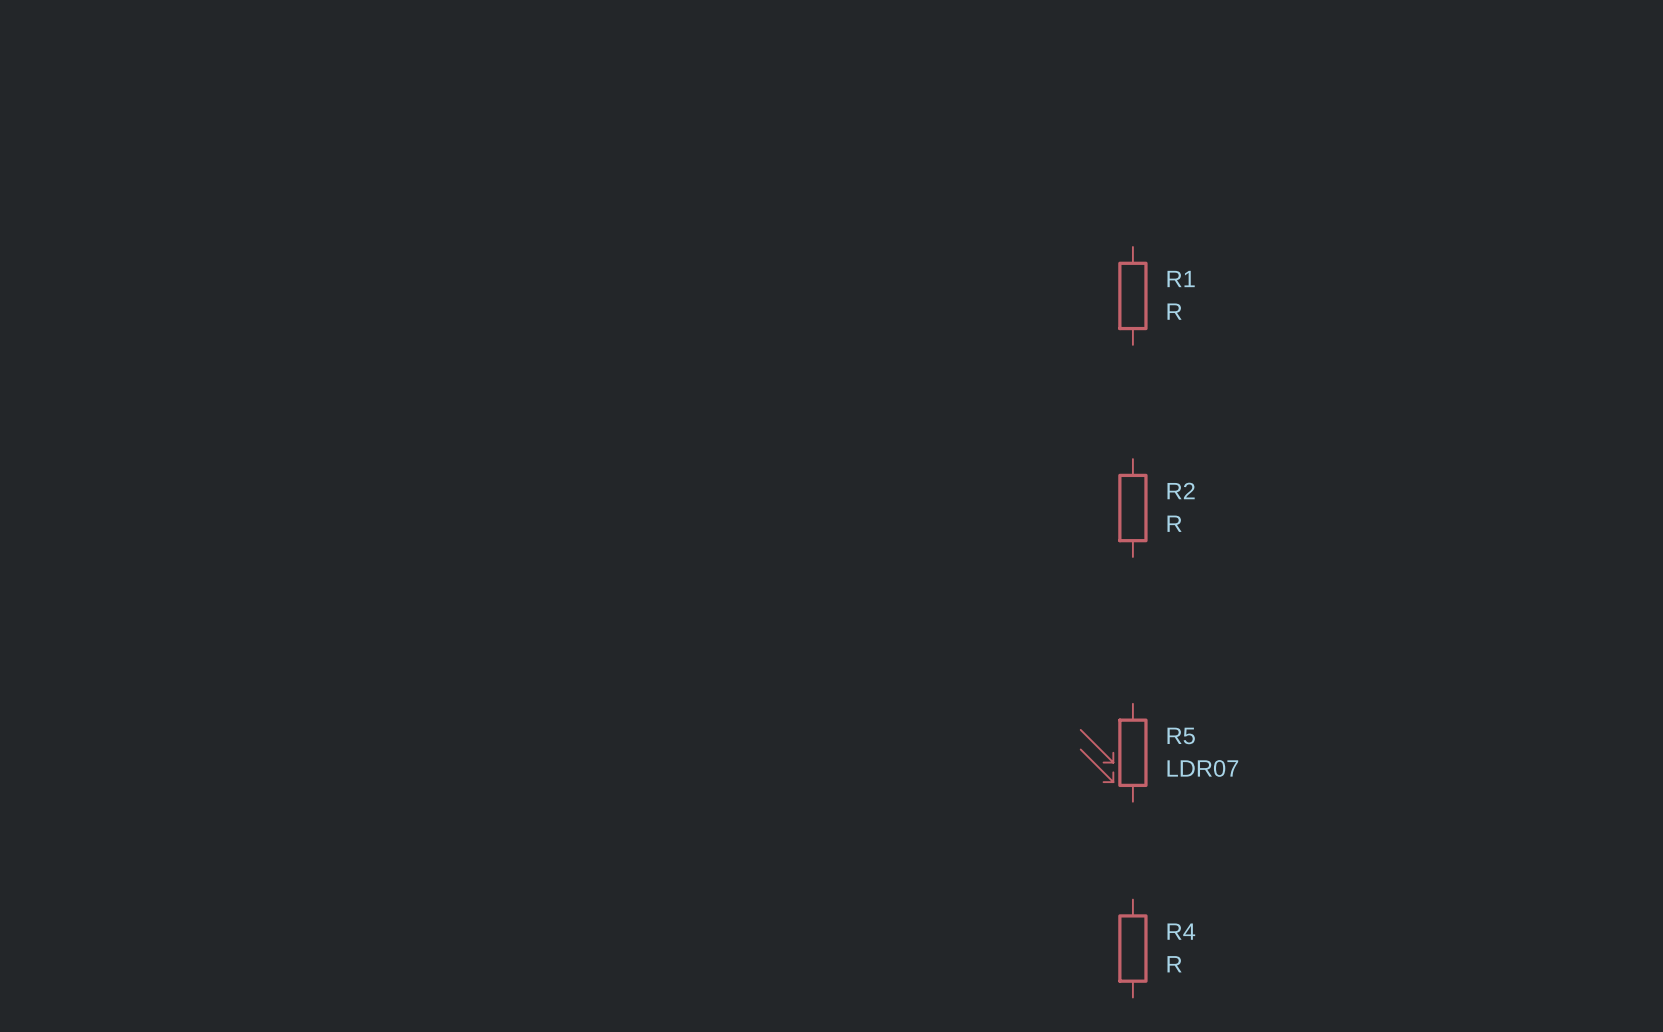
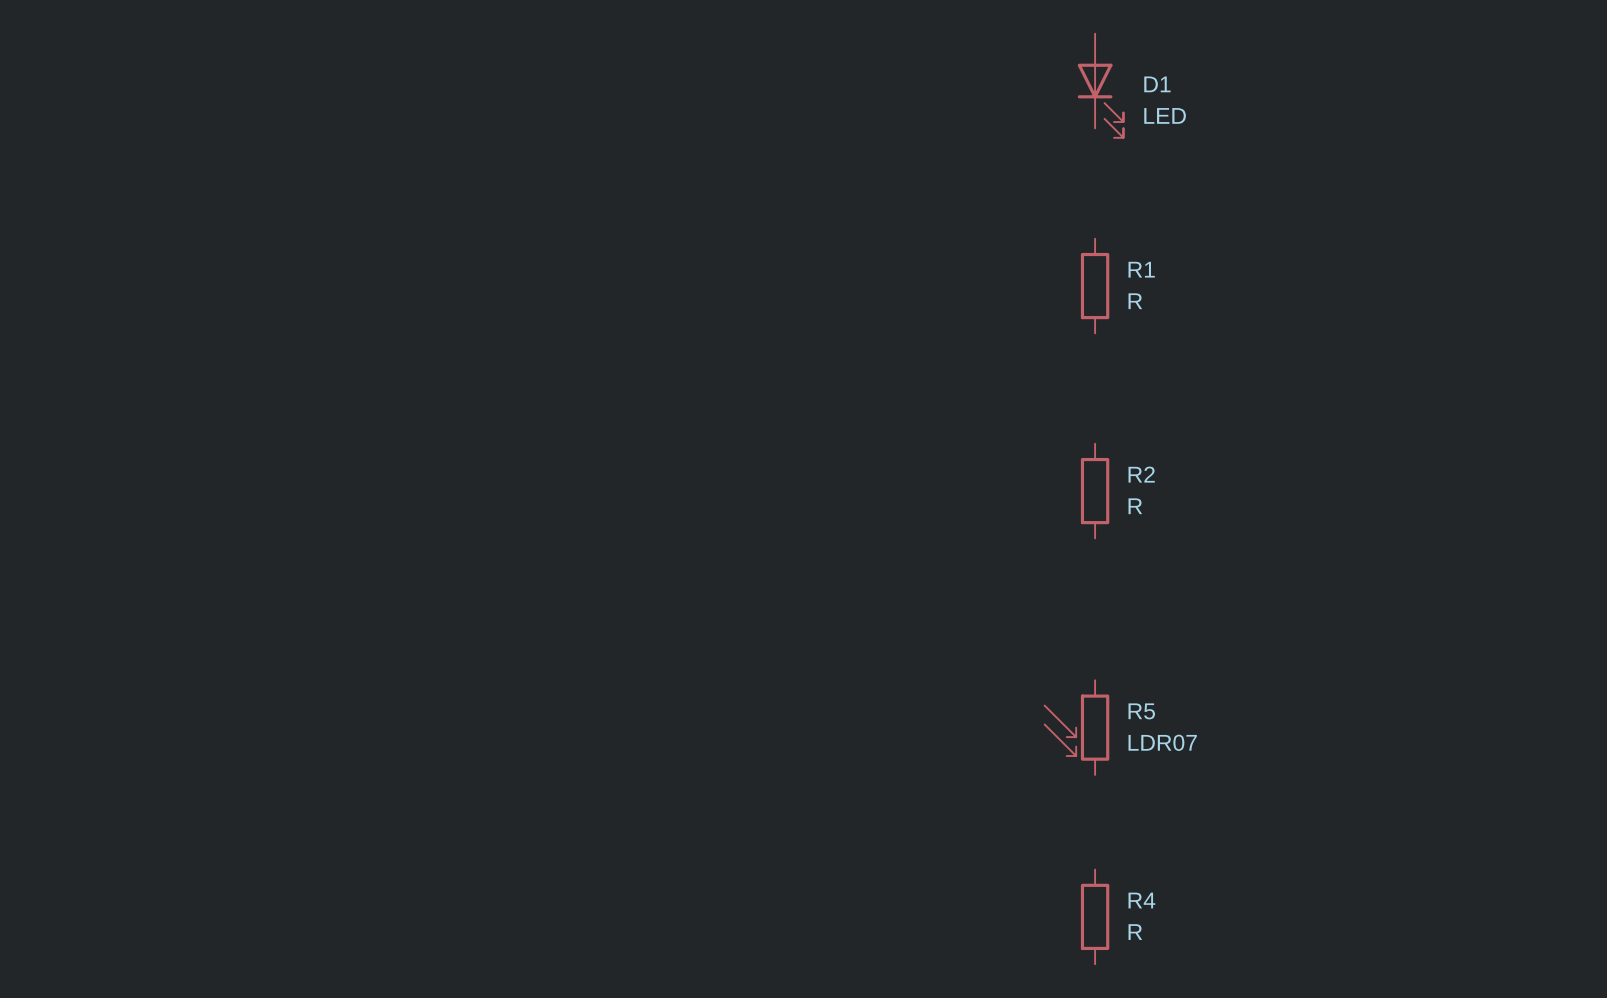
D1: none -> LED (1100, 85)

